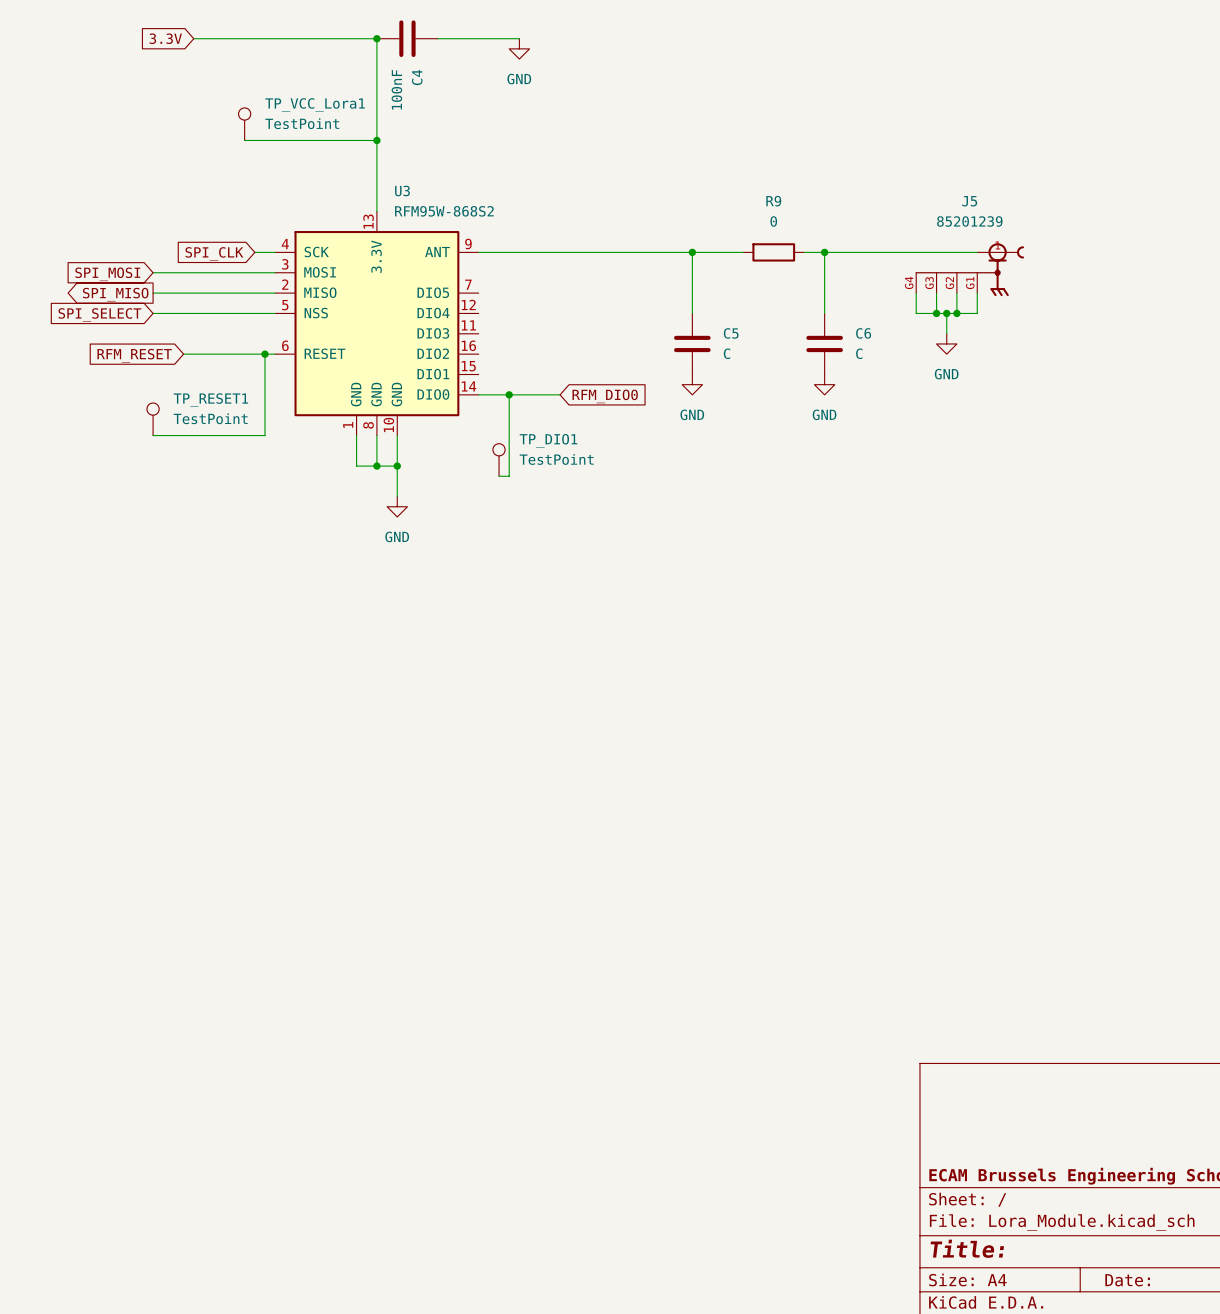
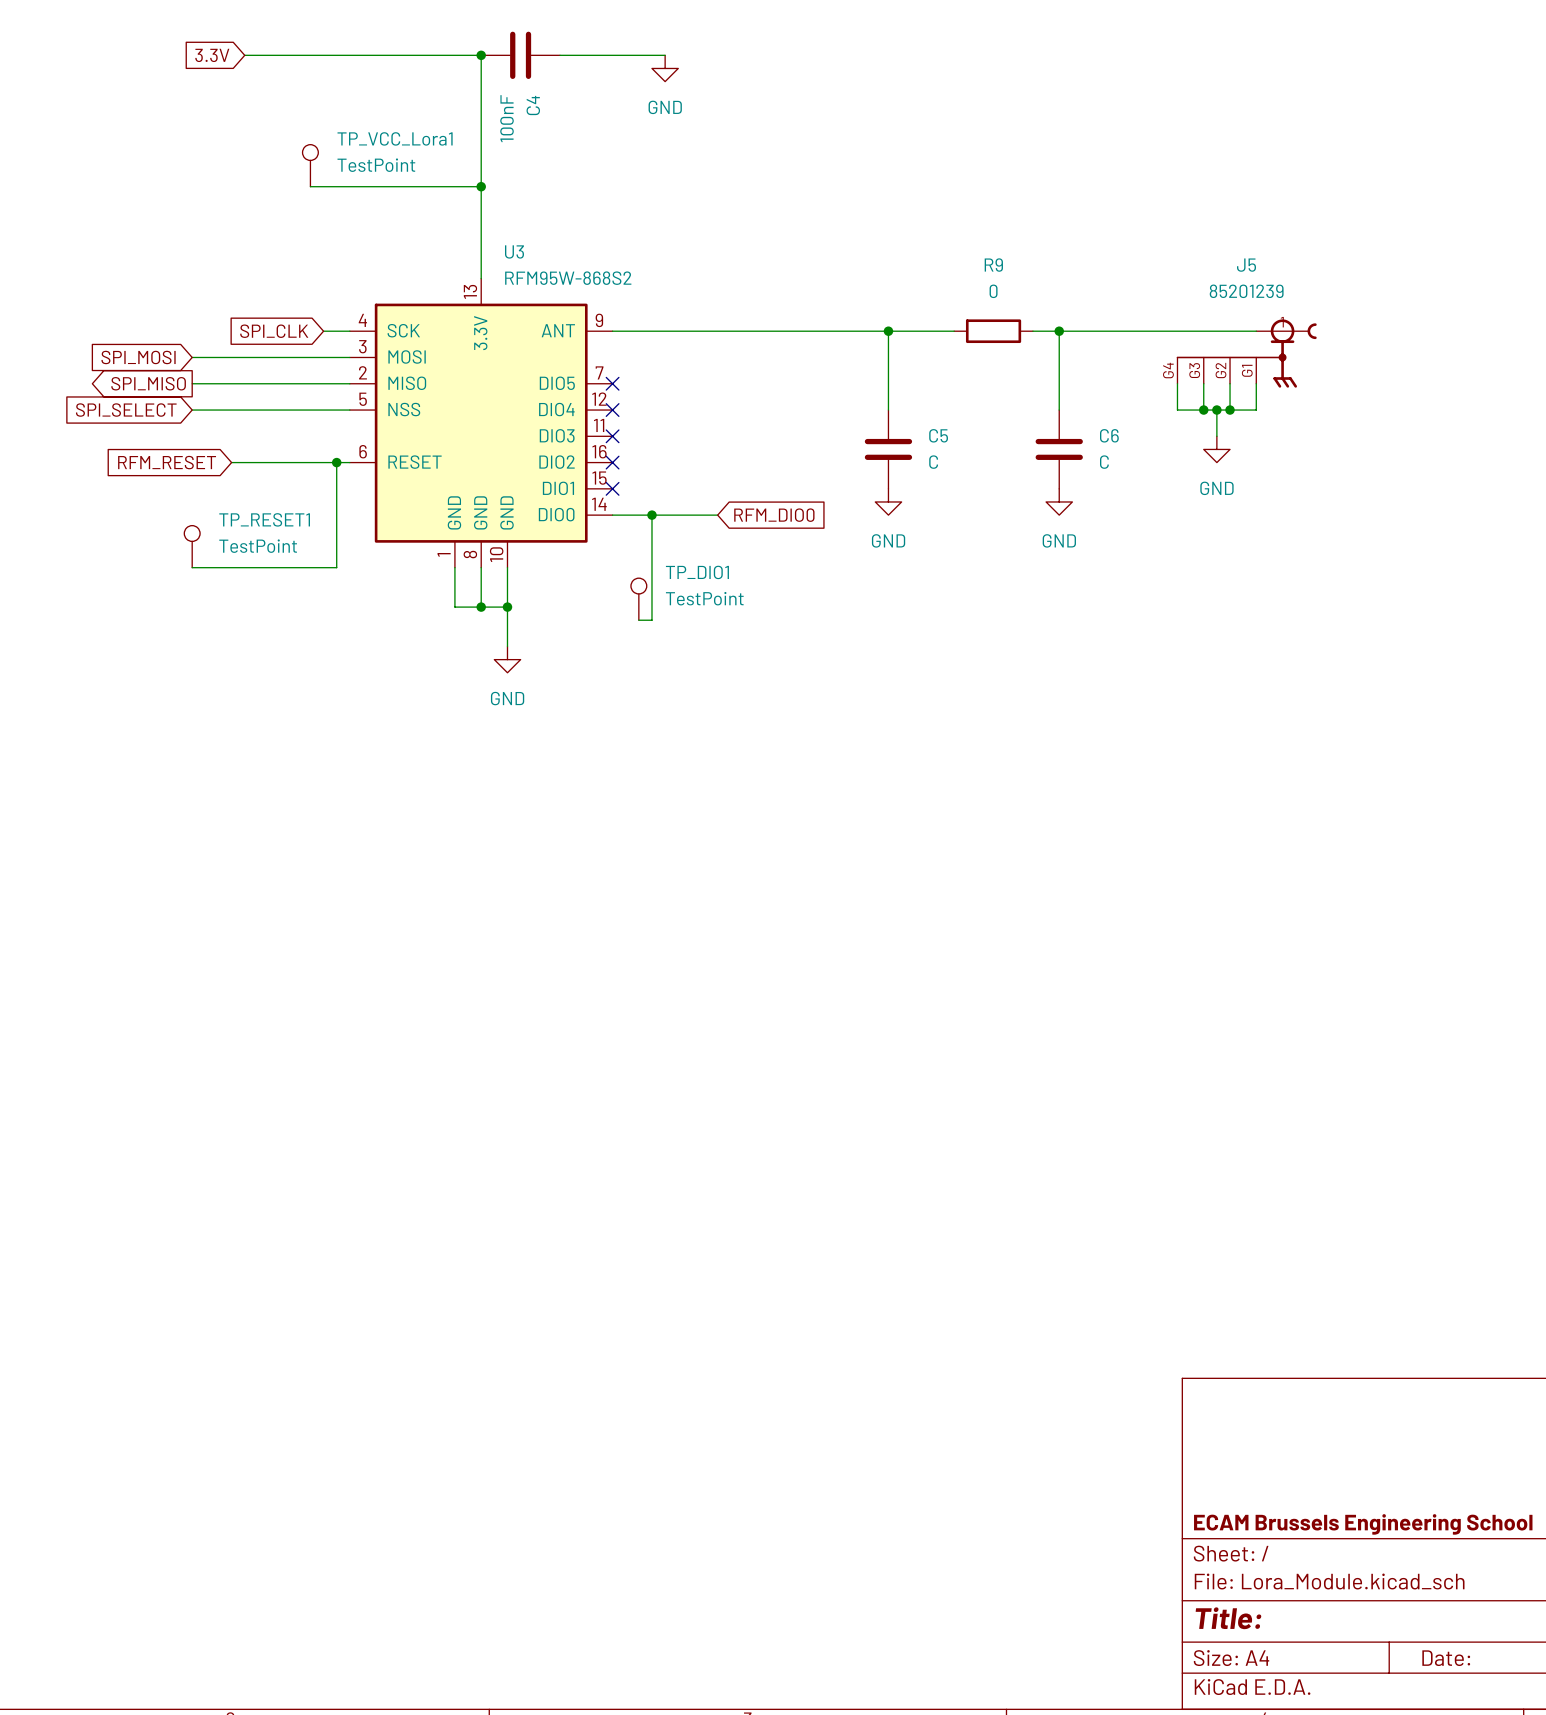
no-connect mark: none -> (612, 383)
no-connect mark: none -> (612, 410)
no-connect mark: none -> (612, 436)
no-connect mark: none -> (612, 462)
no-connect mark: none -> (612, 488)

